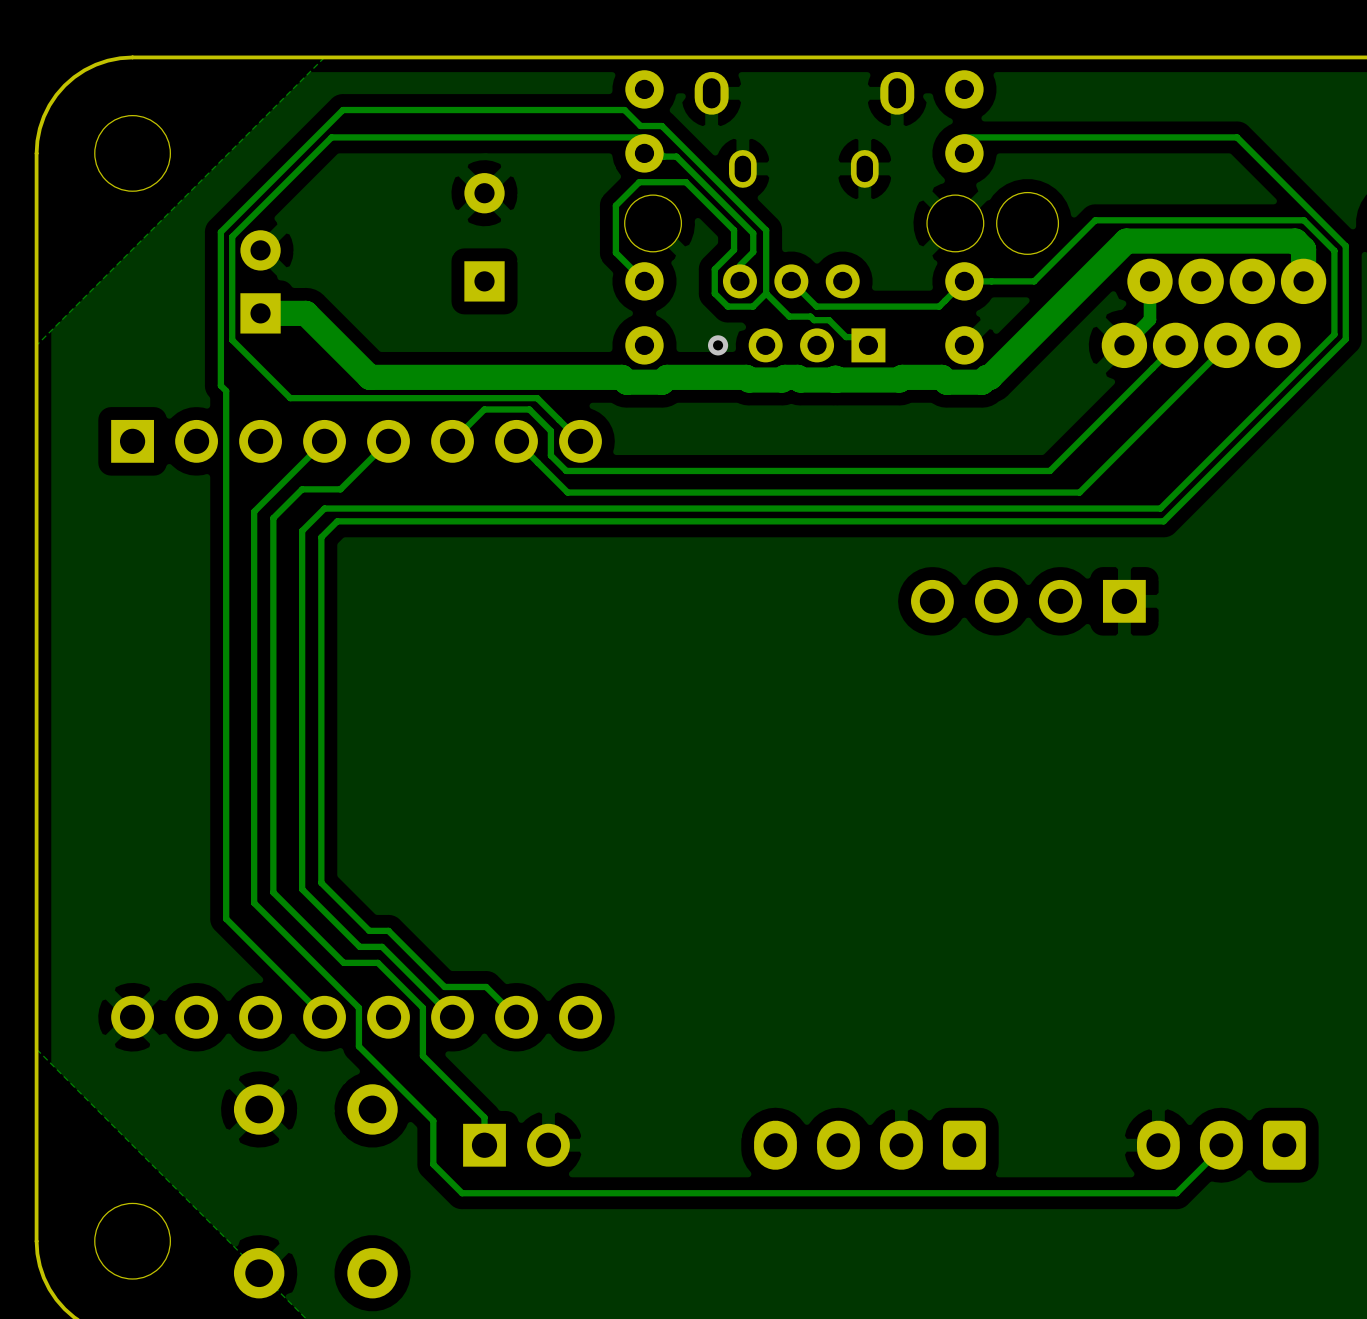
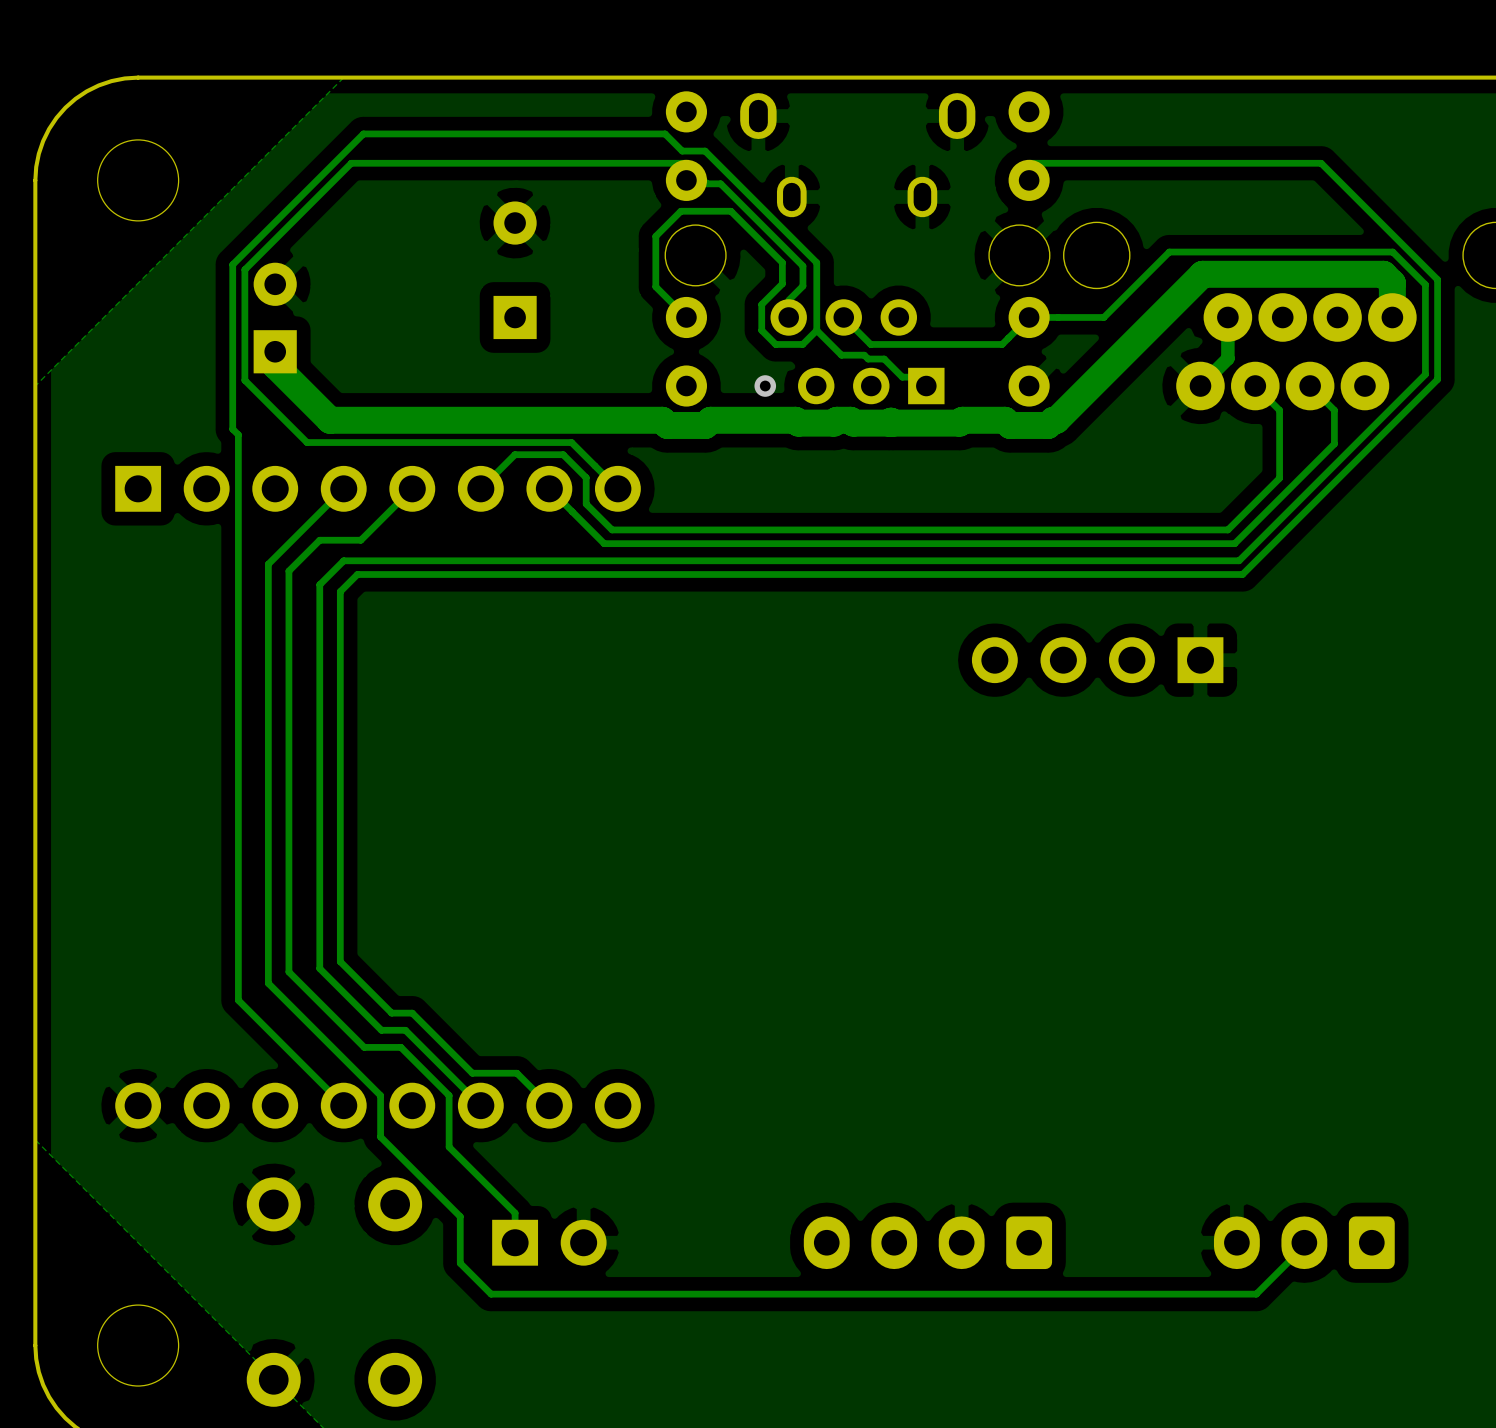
track: (260, 313) (305, 313) (369, 377) -> (275, 351) (275, 365) (330, 420) (392, 420)
track: (1175, 345) (1050, 470) (566, 470) -> (1255, 386) (1279, 410) (1279, 478) (1227, 529) (612, 529) (602, 520)
track: (1226, 345) (1079, 492) -> (1310, 386) (1334, 410) (1334, 443) (1234, 543) (1152, 543)

